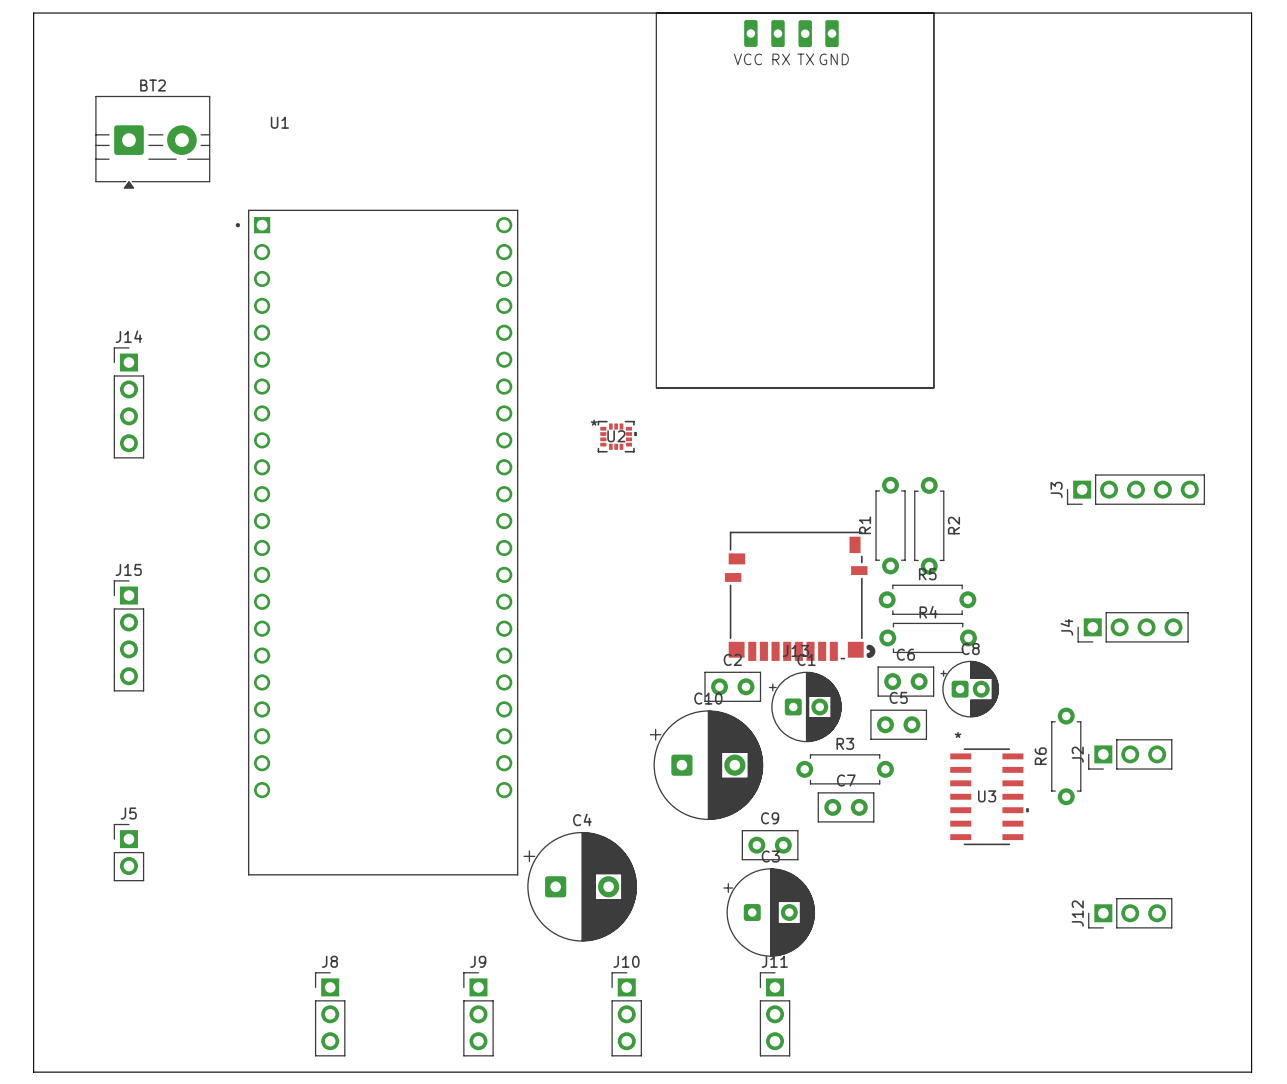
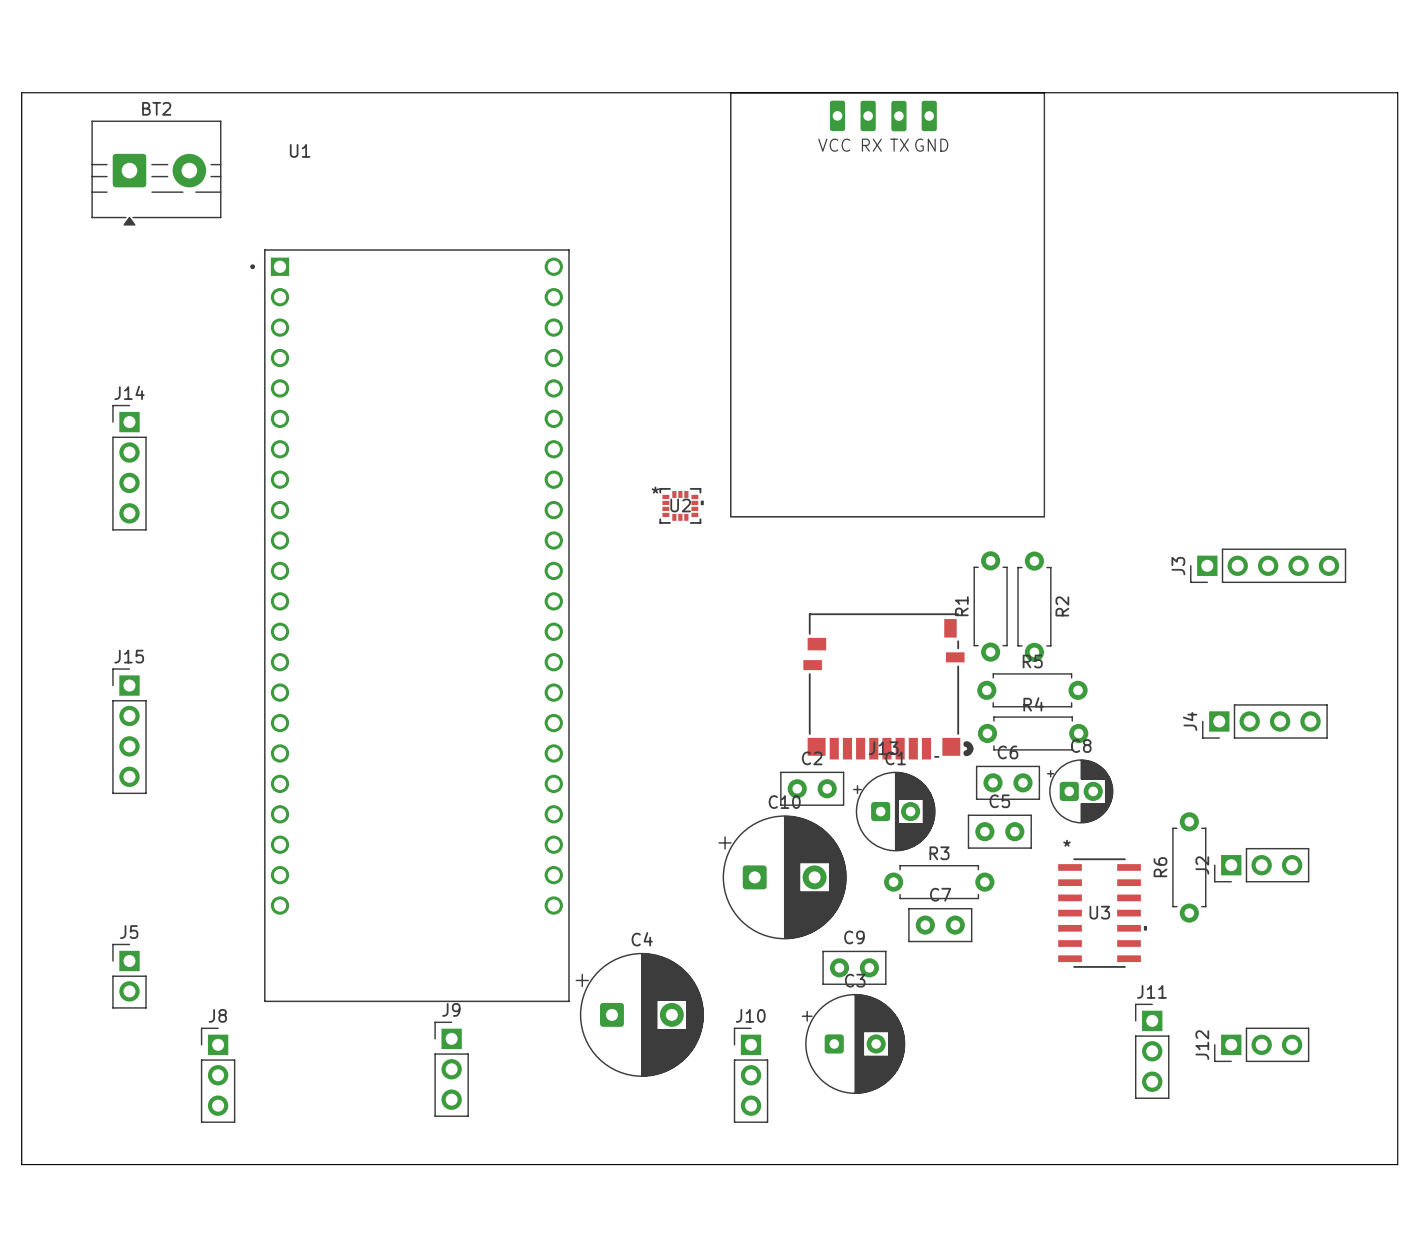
board edge: (33, 71) (33, 13) (1251, 13) (1251, 1072) (33, 1072) (33, 1019) -> (21, 92) (1397, 92) (1397, 1164) (21, 1164)
part position: (795, 200) -> (887, 304)
J8 position: (330, 1014) -> (218, 1075)
J9 position: (478, 1014) -> (451, 1069)
J10 position: (626, 1014) -> (751, 1075)
J11 position: (775, 1014) -> (1152, 1051)

